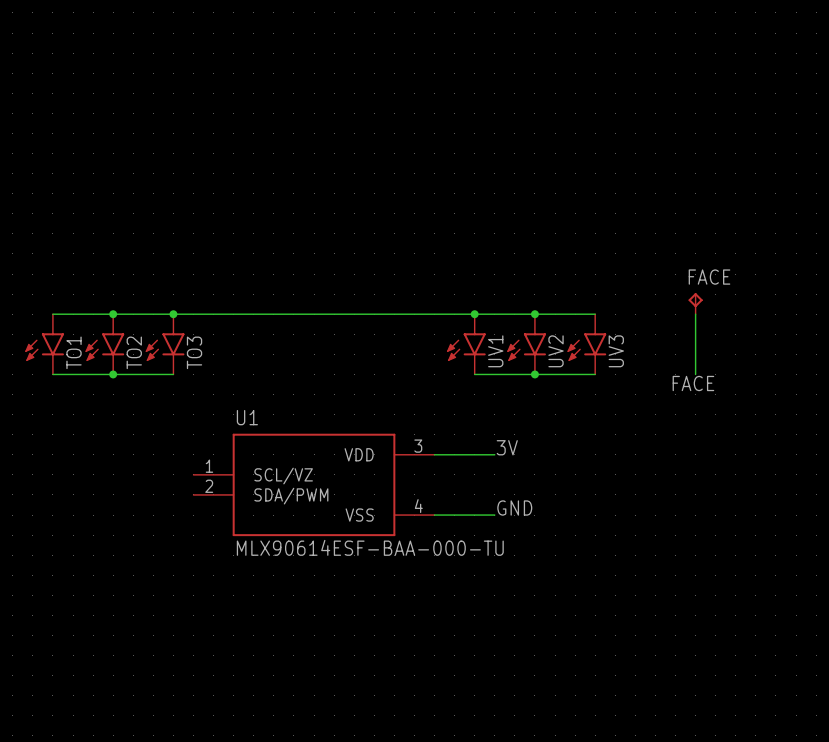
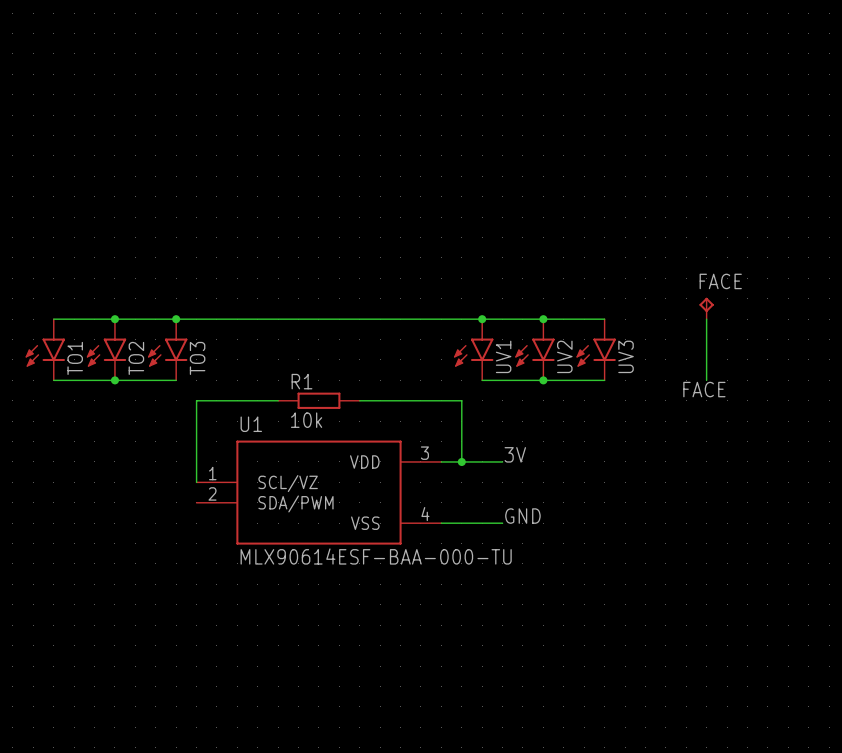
wire: none -> (278, 400) (196, 400) (196, 482)
R1: none -> 10k (318, 400)
wire: none -> (359, 400) (461, 400) (461, 461)
junction: none -> (461, 461)

